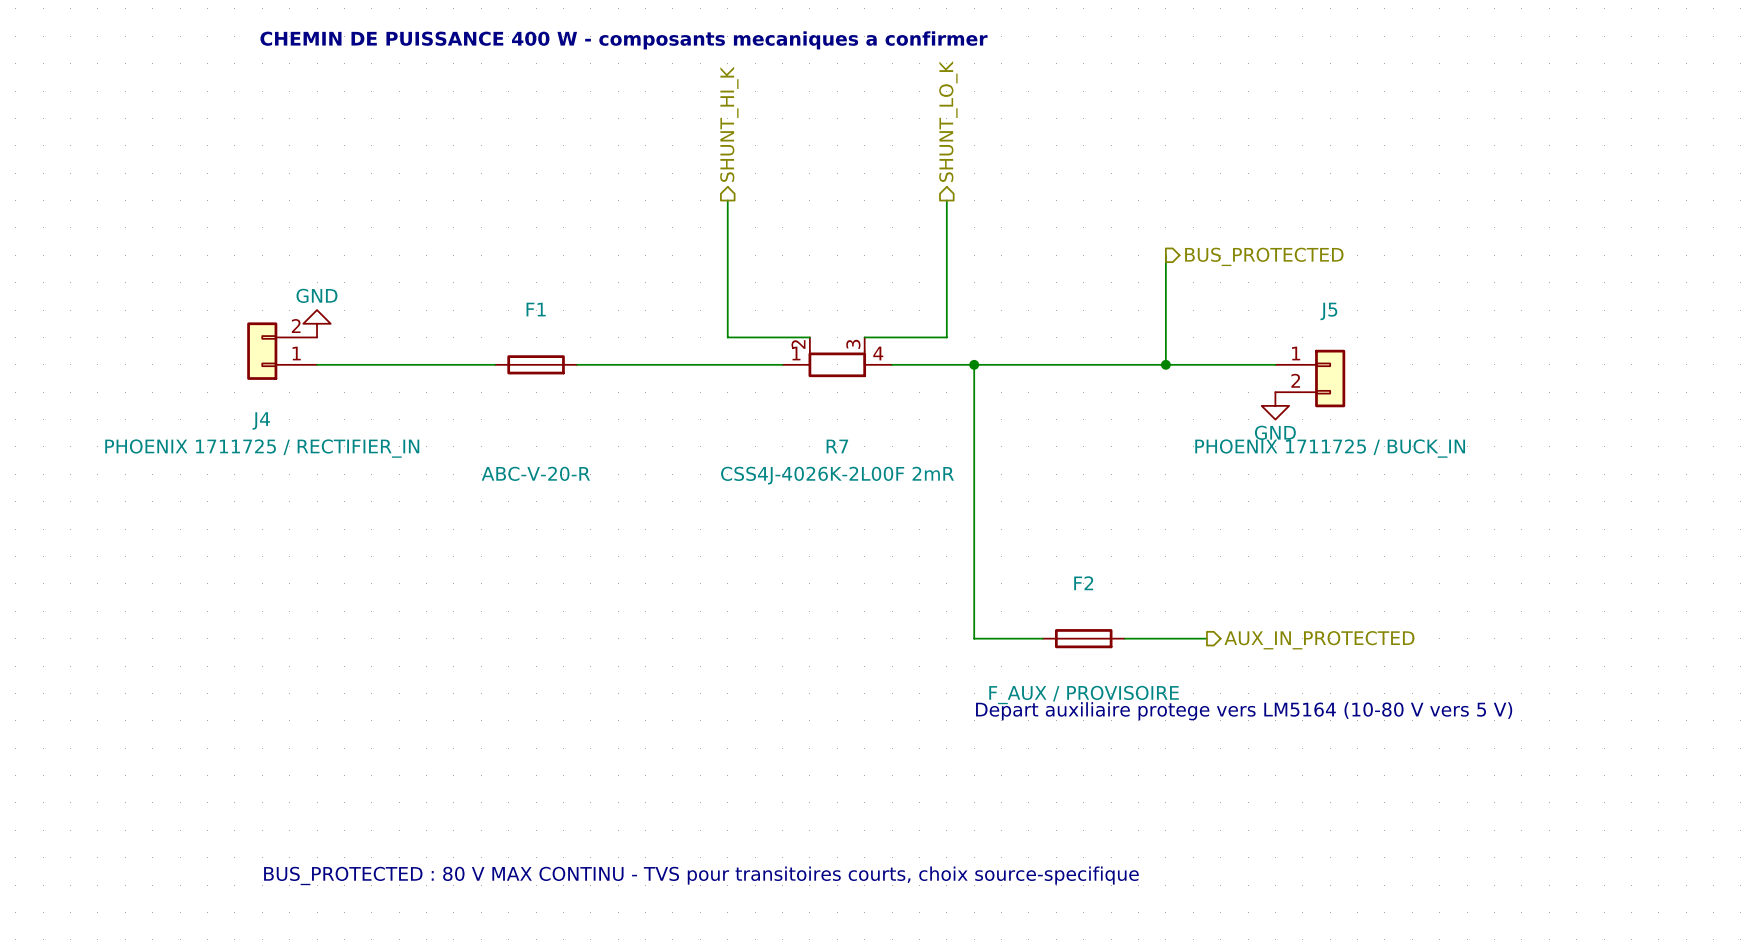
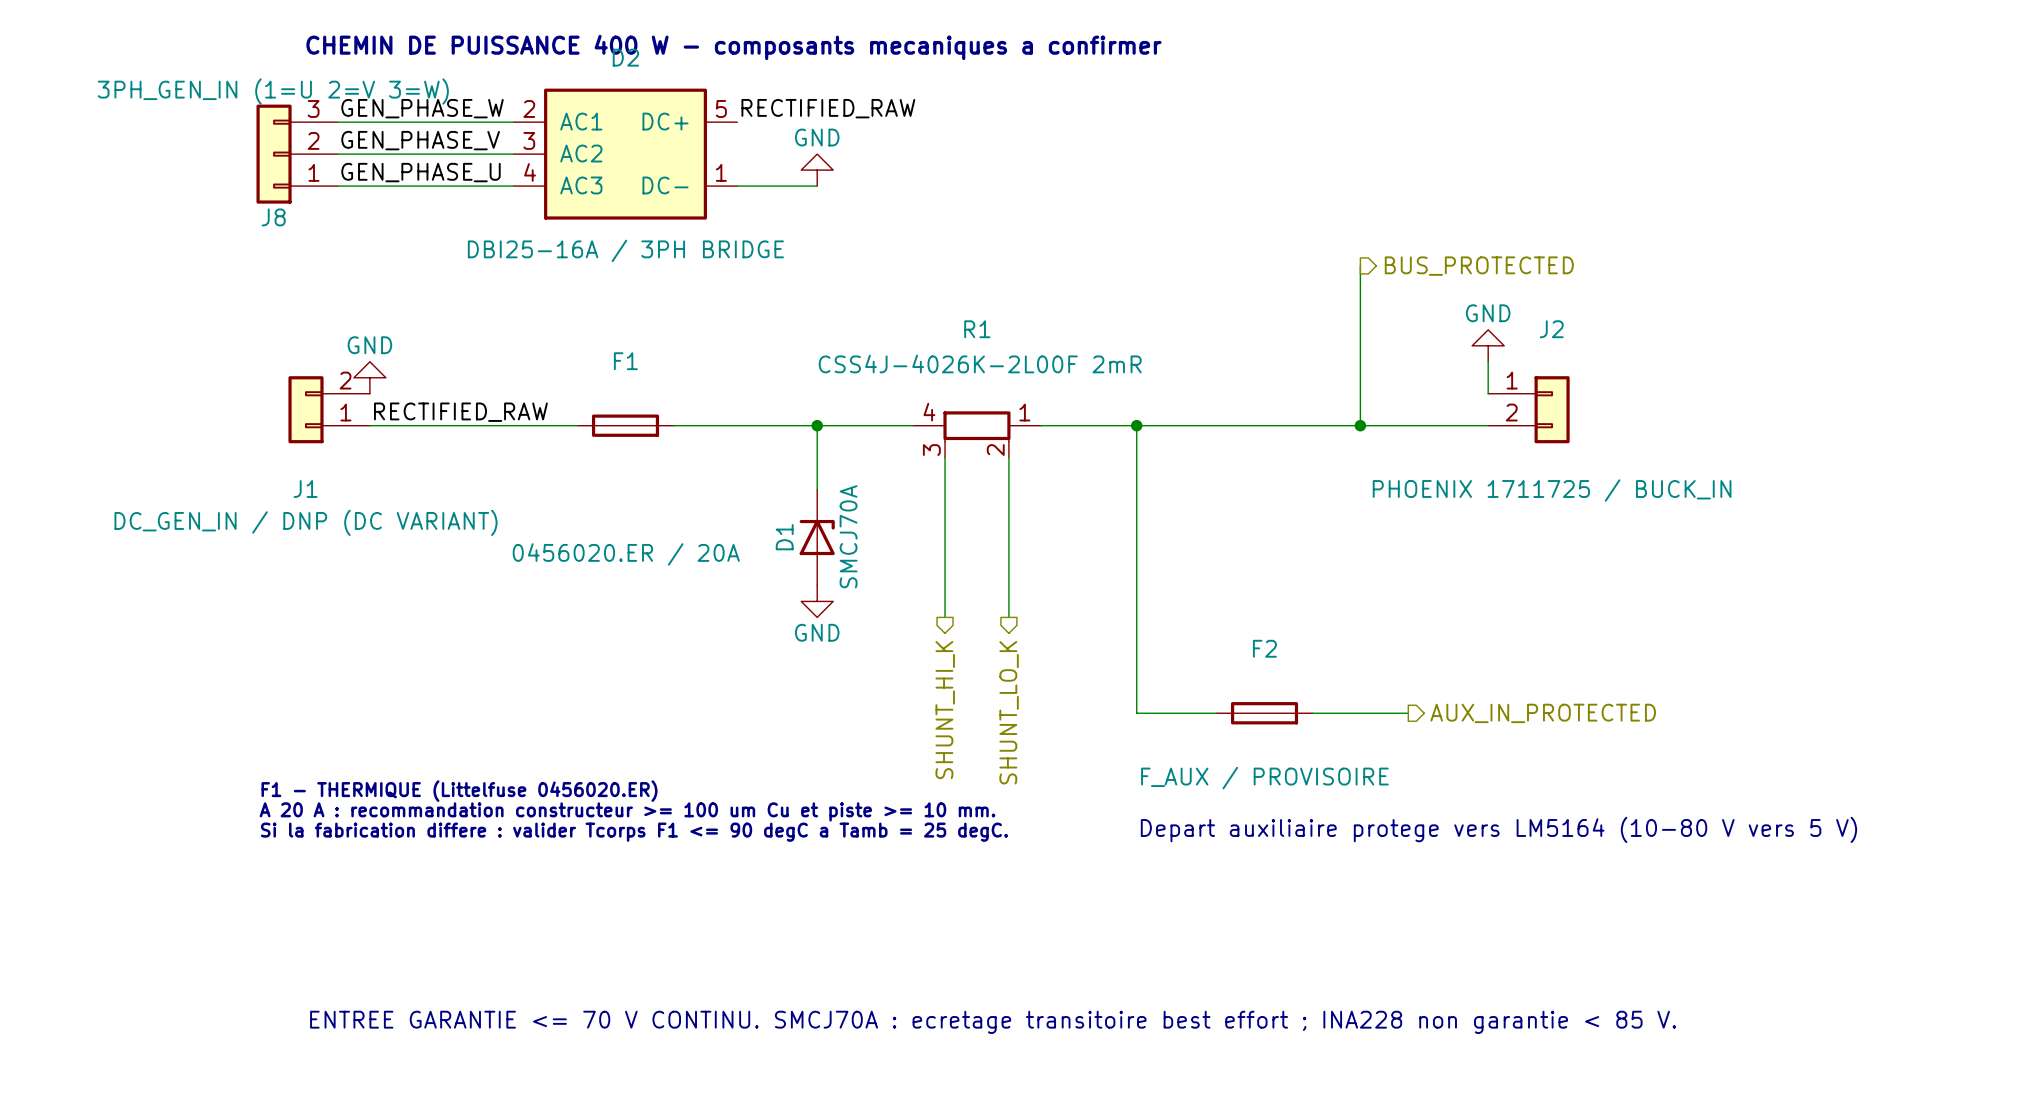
label: none -> GEN_PHASE_W (422, 108)
label: none -> RECTIFIED_RAW (828, 108)
wire: none -> (337, 122) (513, 122)
label: none -> GEN_PHASE_V (420, 140)
hierarchical label: SHUNT_LO_K (948, 121) -> none
hierarchical label: SHUNT_HI_K (729, 124) -> none
J8: none -> 3PH_GEN_IN (1=U 2=V 3=W) (297, 154)
wire: none -> (337, 154) (513, 154)
D2: none -> DBI25-16A / 3PH BRIDGE (625, 154)
power symbol: none -> GND (817, 170)
label: none -> GEN_PHASE_U (420, 172)
wire: none -> (337, 186) (513, 186)
wire: none -> (737, 186) (817, 186)
wire: (727, 200) (727, 337) (809, 337) -> none
wire: (946, 200) (946, 337) (864, 337) -> none
wire: none -> (1360, 265) (1360, 297)
hierarchical label position: BUS_PROTECTED (1264, 256) -> BUS_PROTECTED (1479, 266)
wire: none -> (1488, 361) (1488, 393)
J2: none -> PHOENIX 1711725 / BUCK_IN (1528, 409)
label: none -> RECTIFIED_RAW (460, 412)
R7: CSS4J-4026K-2L00F 2mR (837, 357) -> none
wire: none -> (817, 425) (817, 489)
junction: none -> (817, 425)
R1: none -> CSS4J-4026K-2L00F 2mR (976, 434)
J5: PHOENIX 1711725 / BUCK_IN (1310, 378) -> none
wire: none -> (945, 457) (945, 617)
wire: none -> (1008, 457) (1008, 617)
power symbol rotation: 0° (1275, 405) -> 180° (1488, 345)
power symbol position: GND (1275, 405) -> GND (1488, 345)
J4 name: J4 (261, 420) -> J1 (305, 489)
J4 value: PHOENIX 1711725 / RECTIFIER_IN (262, 448) -> DC_GEN_IN / DNP (DC VARIANT) (306, 522)
D1: none -> SMCJ70A (817, 537)
F1 value: ABC-V-20-R (535, 473) -> 0456020.ER / 20A (626, 554)
power symbol: none -> GND (817, 601)
hierarchical label: none -> SHUNT_HI_K (945, 710)
hierarchical label: none -> SHUNT_LO_K (1009, 712)
wire: (974, 611) (974, 638) (1042, 638) -> (1136, 713) (1216, 713)
F2 position: (1083, 638) -> (1264, 713)
wire: (1124, 638) (1206, 638) -> (1312, 713) (1408, 713)
hierarchical label position: AUX_IN_PROTECTED (1319, 640) -> AUX_IN_PROTECTED (1543, 713)
text: none -> F1 - THERMIQUE (Littelfuse 0456020.ER) (459, 791)
text: none -> A 20 A : recommandation constructeur >= 100 um Cu et piste >= 10 mm. (627, 811)
text: none -> Si la fabrication differe : valider Tcorps F1 <= 90 degC a Tamb = 25 degC. (634, 832)
text: BUS_PROTECTED : 80 V MAX CONTINU - TVS pour transitoires courts, choix source-specifique (701, 875) -> ENTREE GARANTIE <= 70 V CONTINU. SMCJ70A : ecretage transitoire best effort ; INA228 non garantie < 85 V. (993, 1022)

